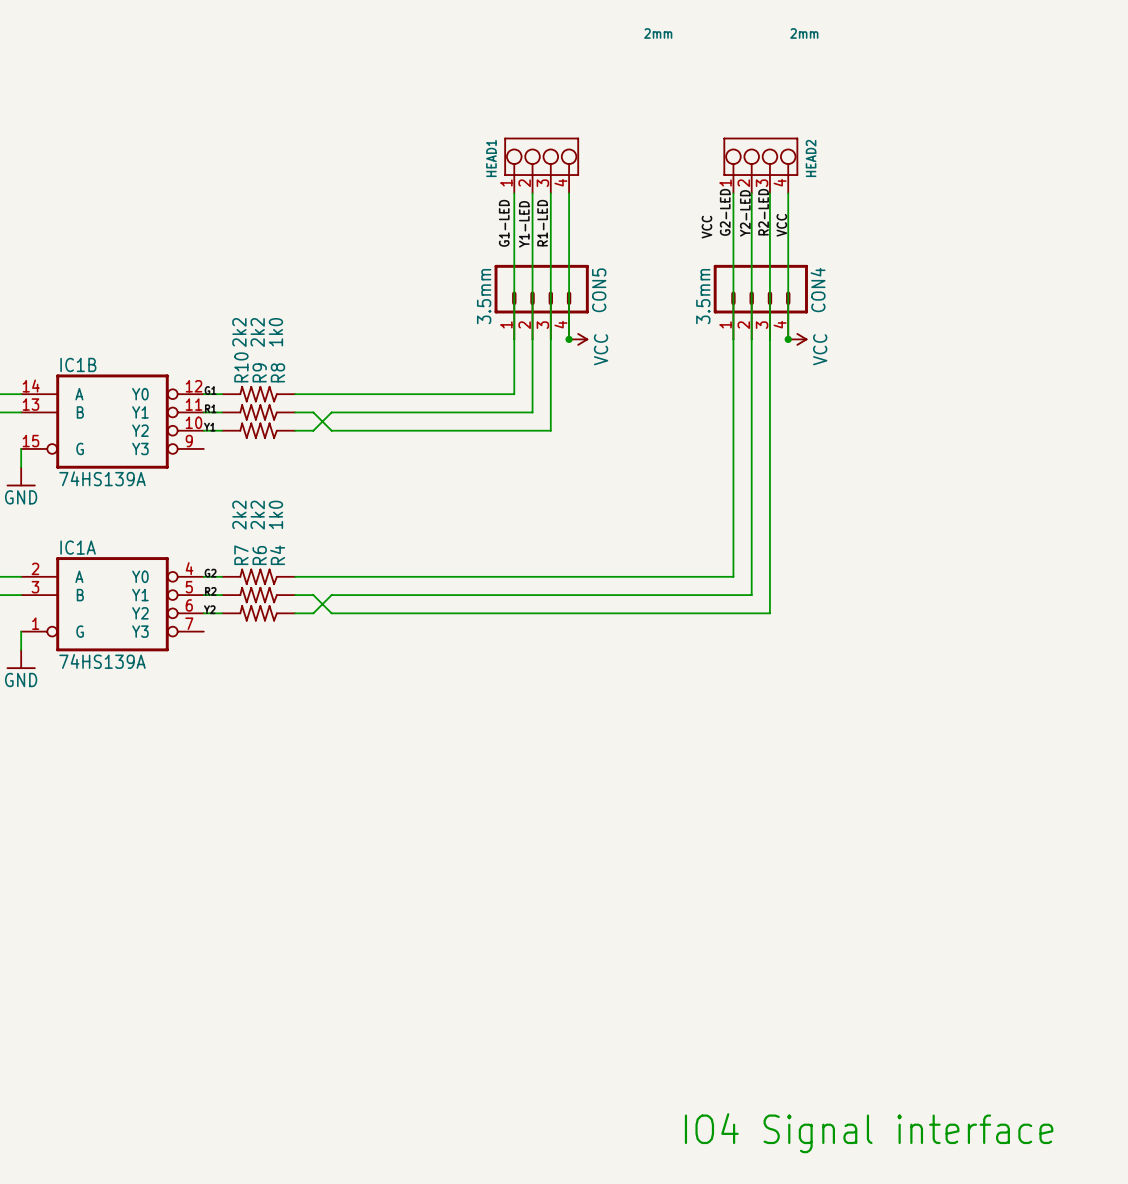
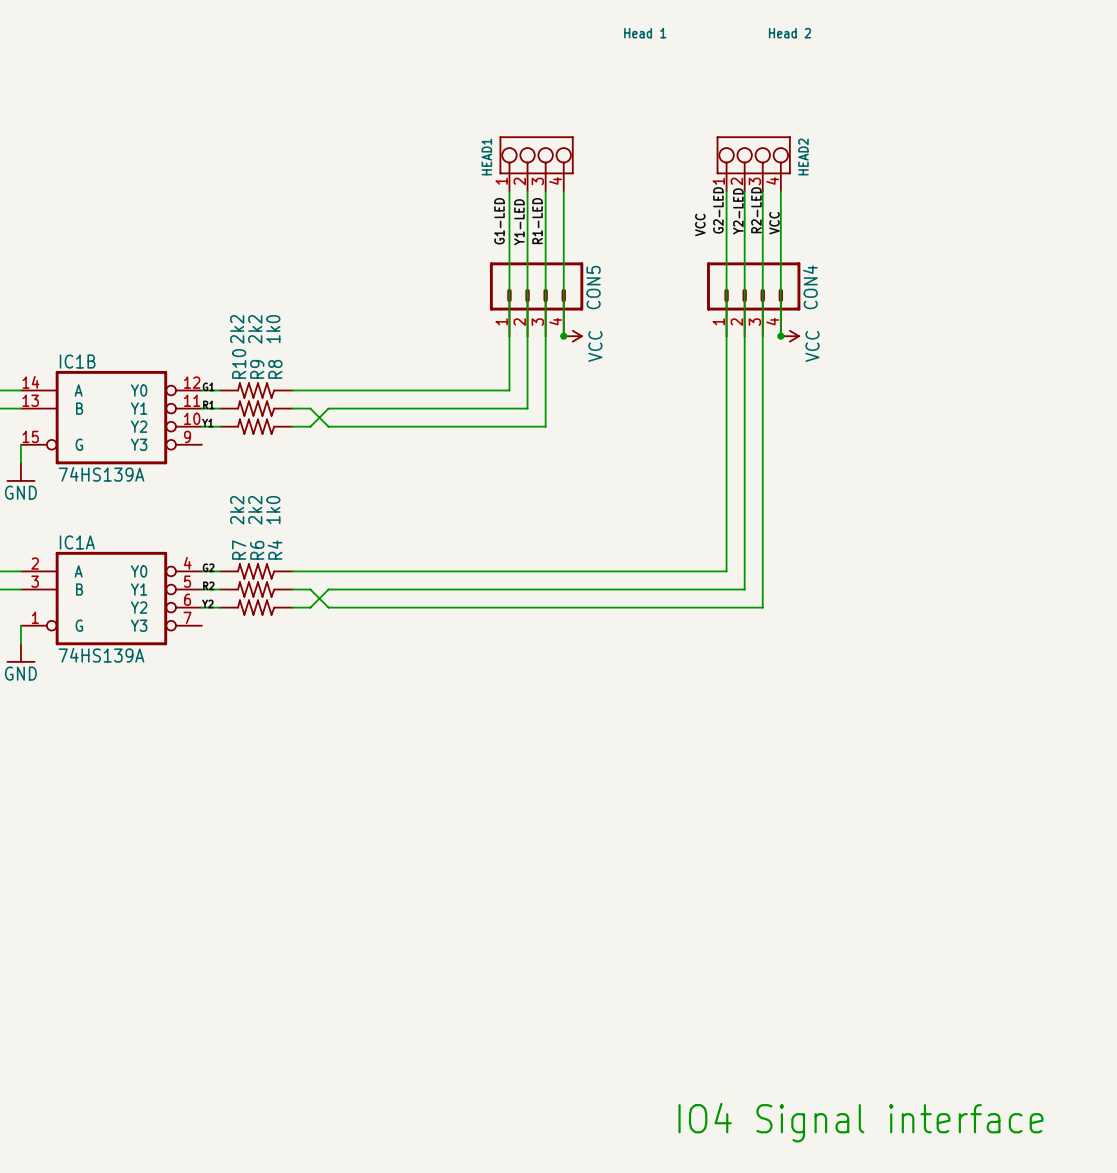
HEAD1 value: 2mm (658, 33) -> Head 1 (645, 33)
HEAD2 value: 2mm (804, 33) -> Head 2 (790, 33)
CON5 value: 3.5mm (484, 296) -> none
CON4 value: 3.5mm (703, 296) -> none

